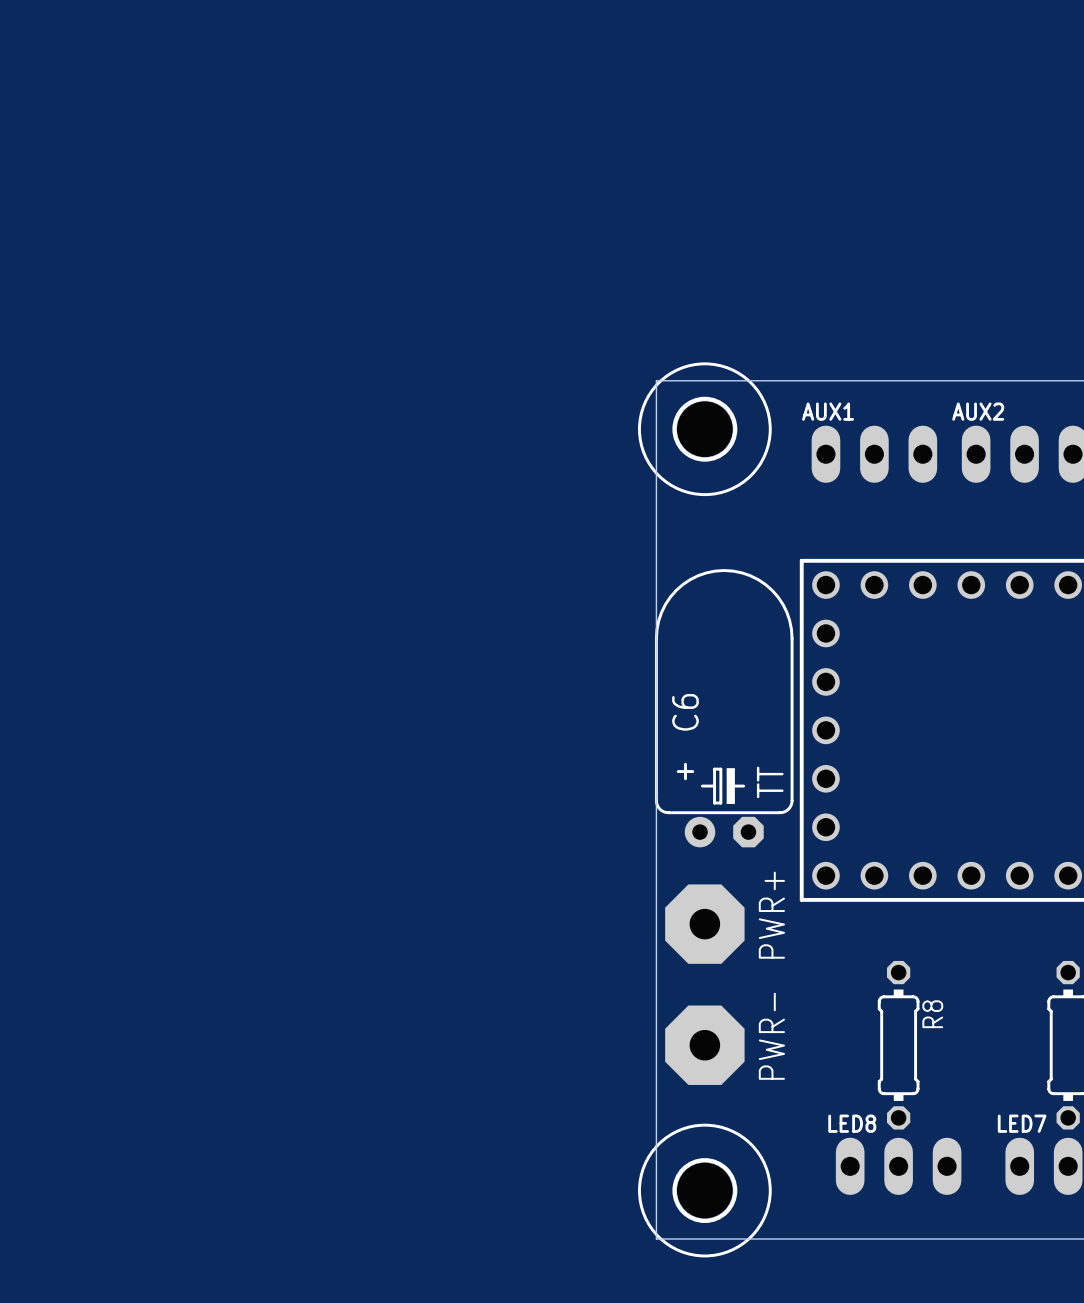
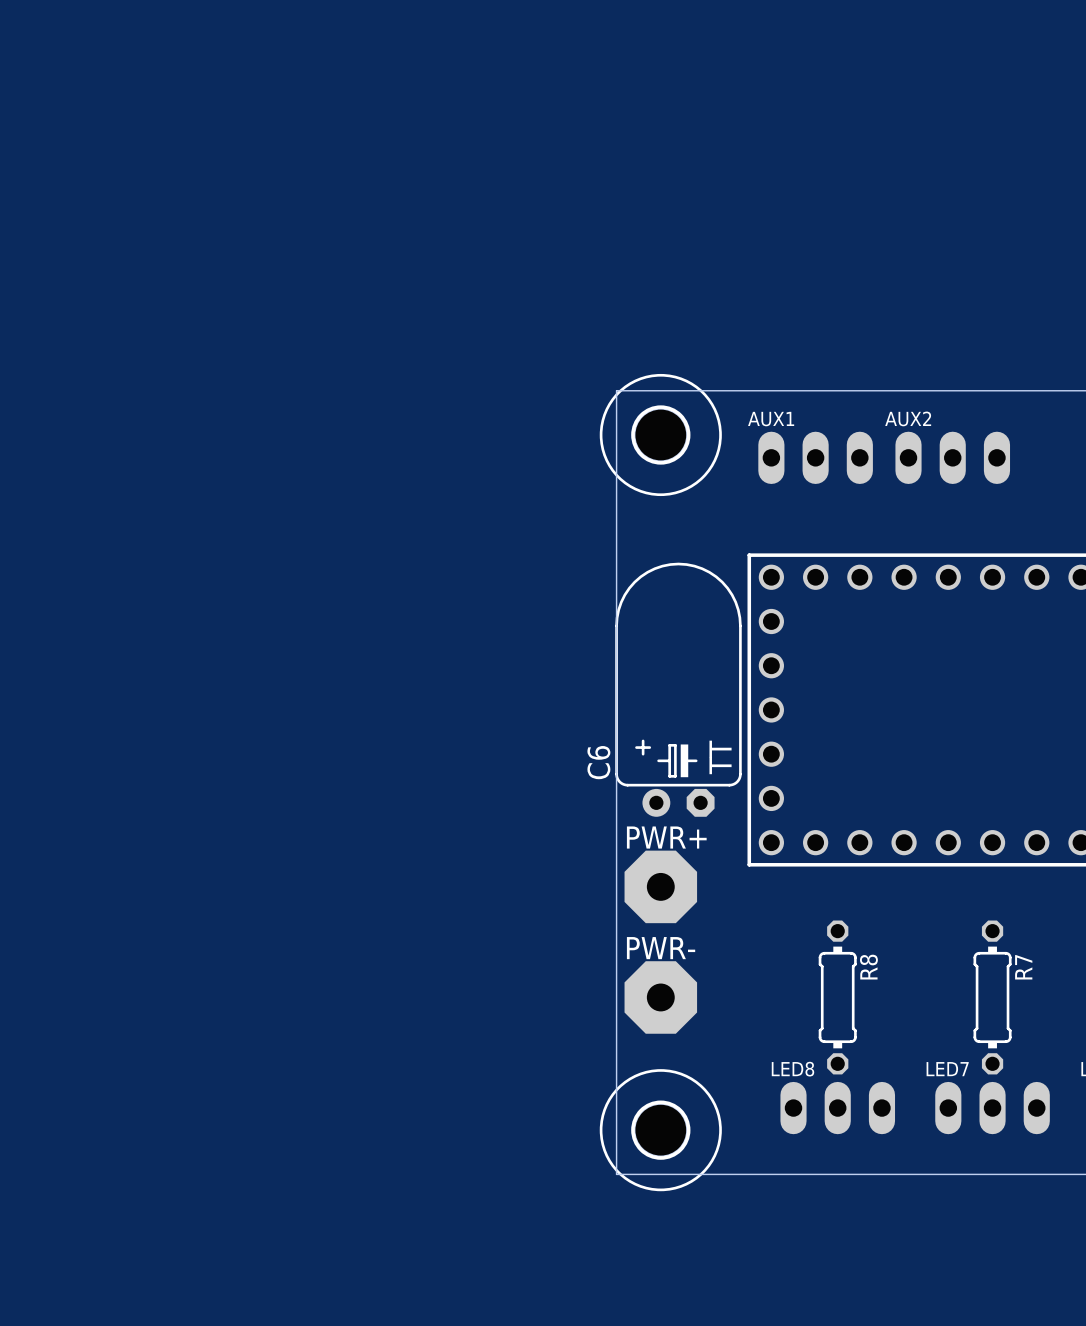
C6 name position: C6 (685, 712) -> C6 (598, 762)
PWR+ name rotation: 0° (771, 915) -> 90° clockwise (666, 837)
PWR- name rotation: 0° (771, 1036) -> 90° clockwise (661, 948)

